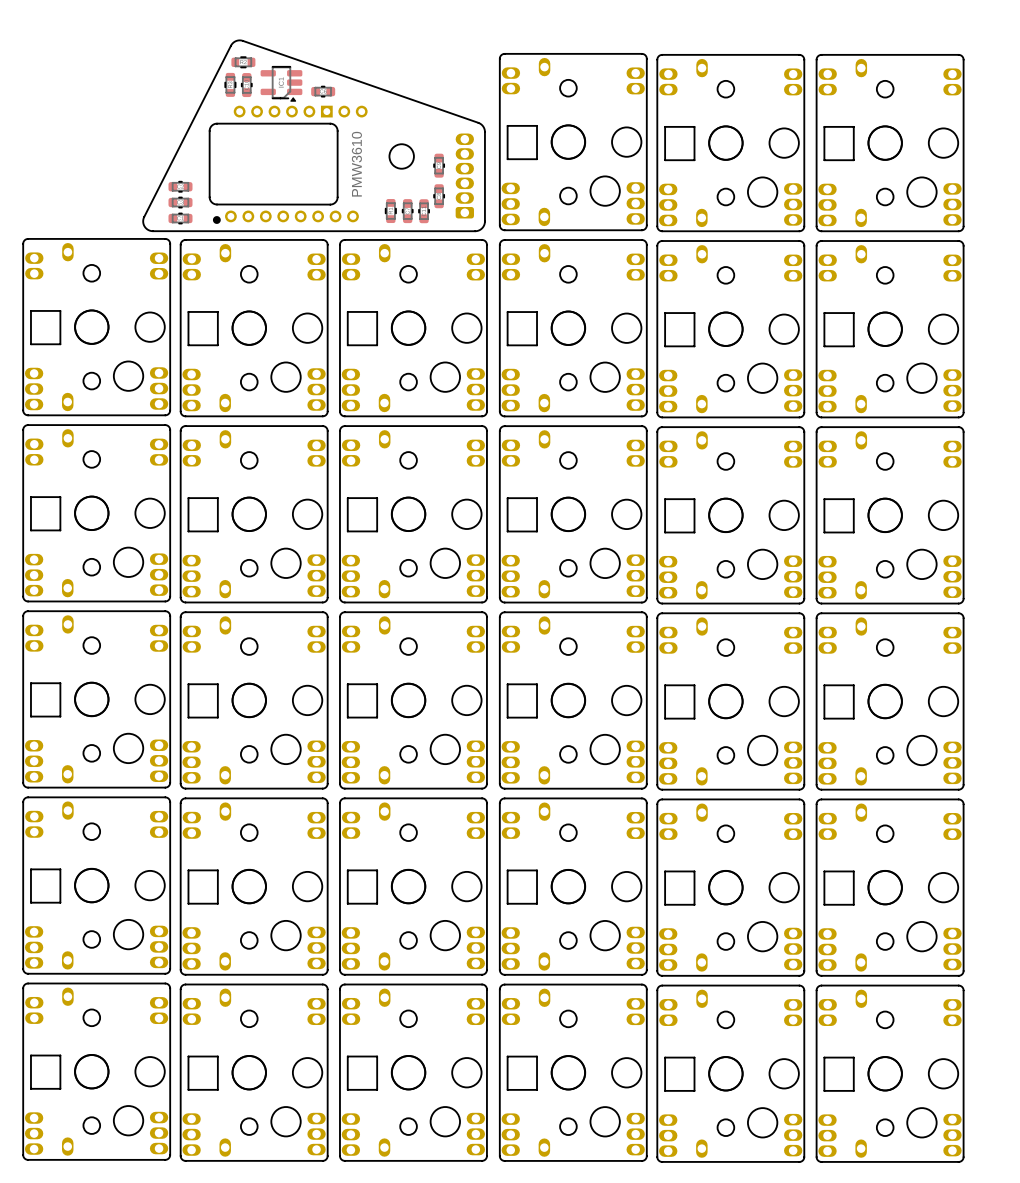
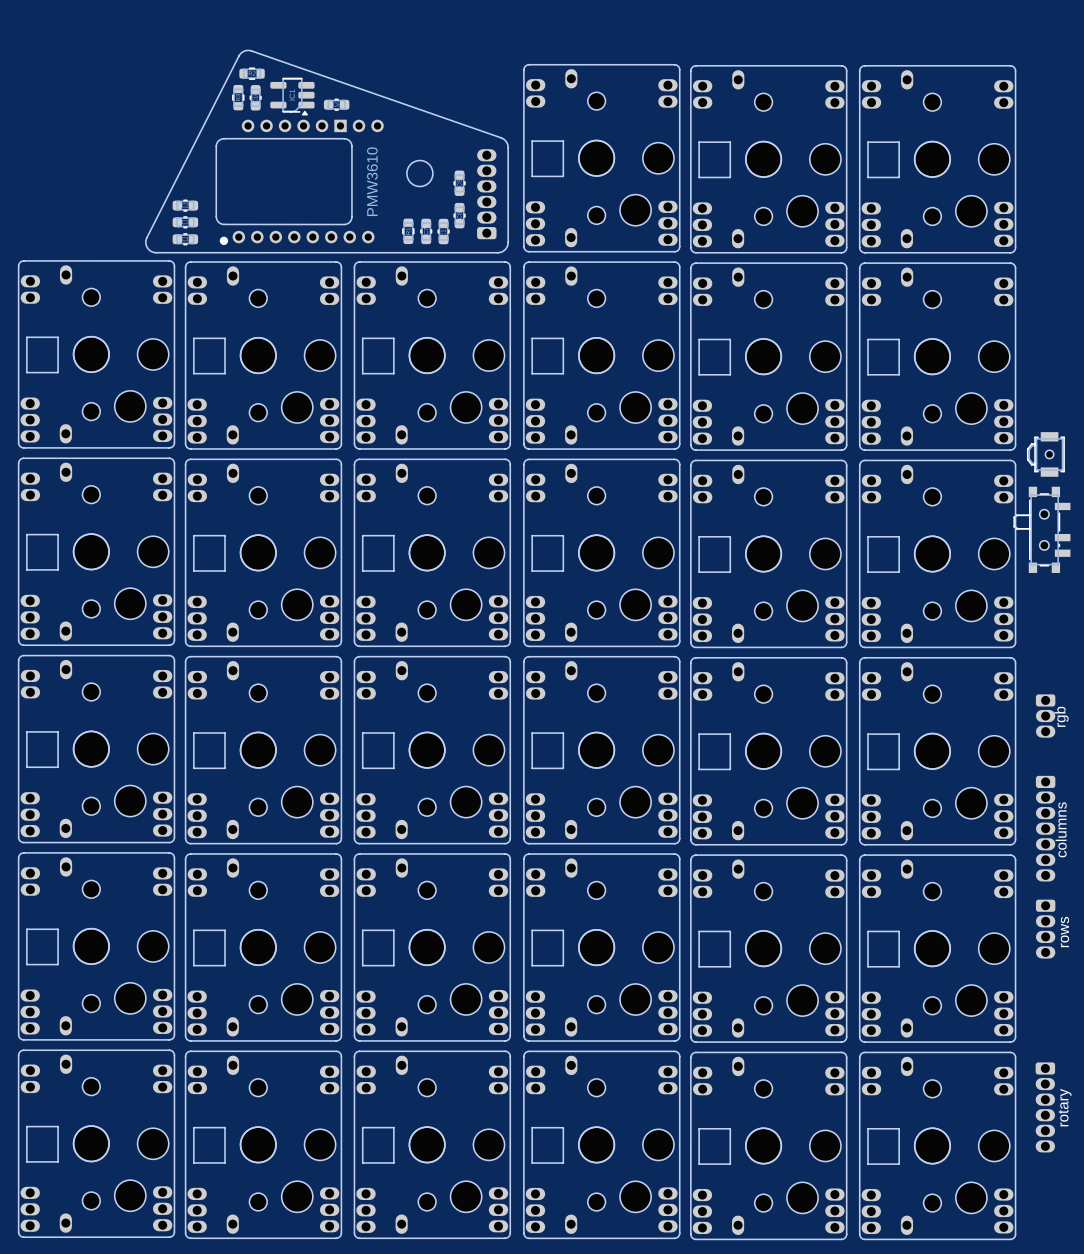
part: none -> (1045, 454)
part: none -> (1042, 529)
part: none -> (1045, 716)
text: none -> rgb (1061, 716)
part: none -> (1045, 828)
text: none -> columns (1061, 829)
part: none -> (1045, 929)
text: none -> rows (1064, 932)
part: none -> (1045, 1107)
text: none -> rotary (1065, 1107)

